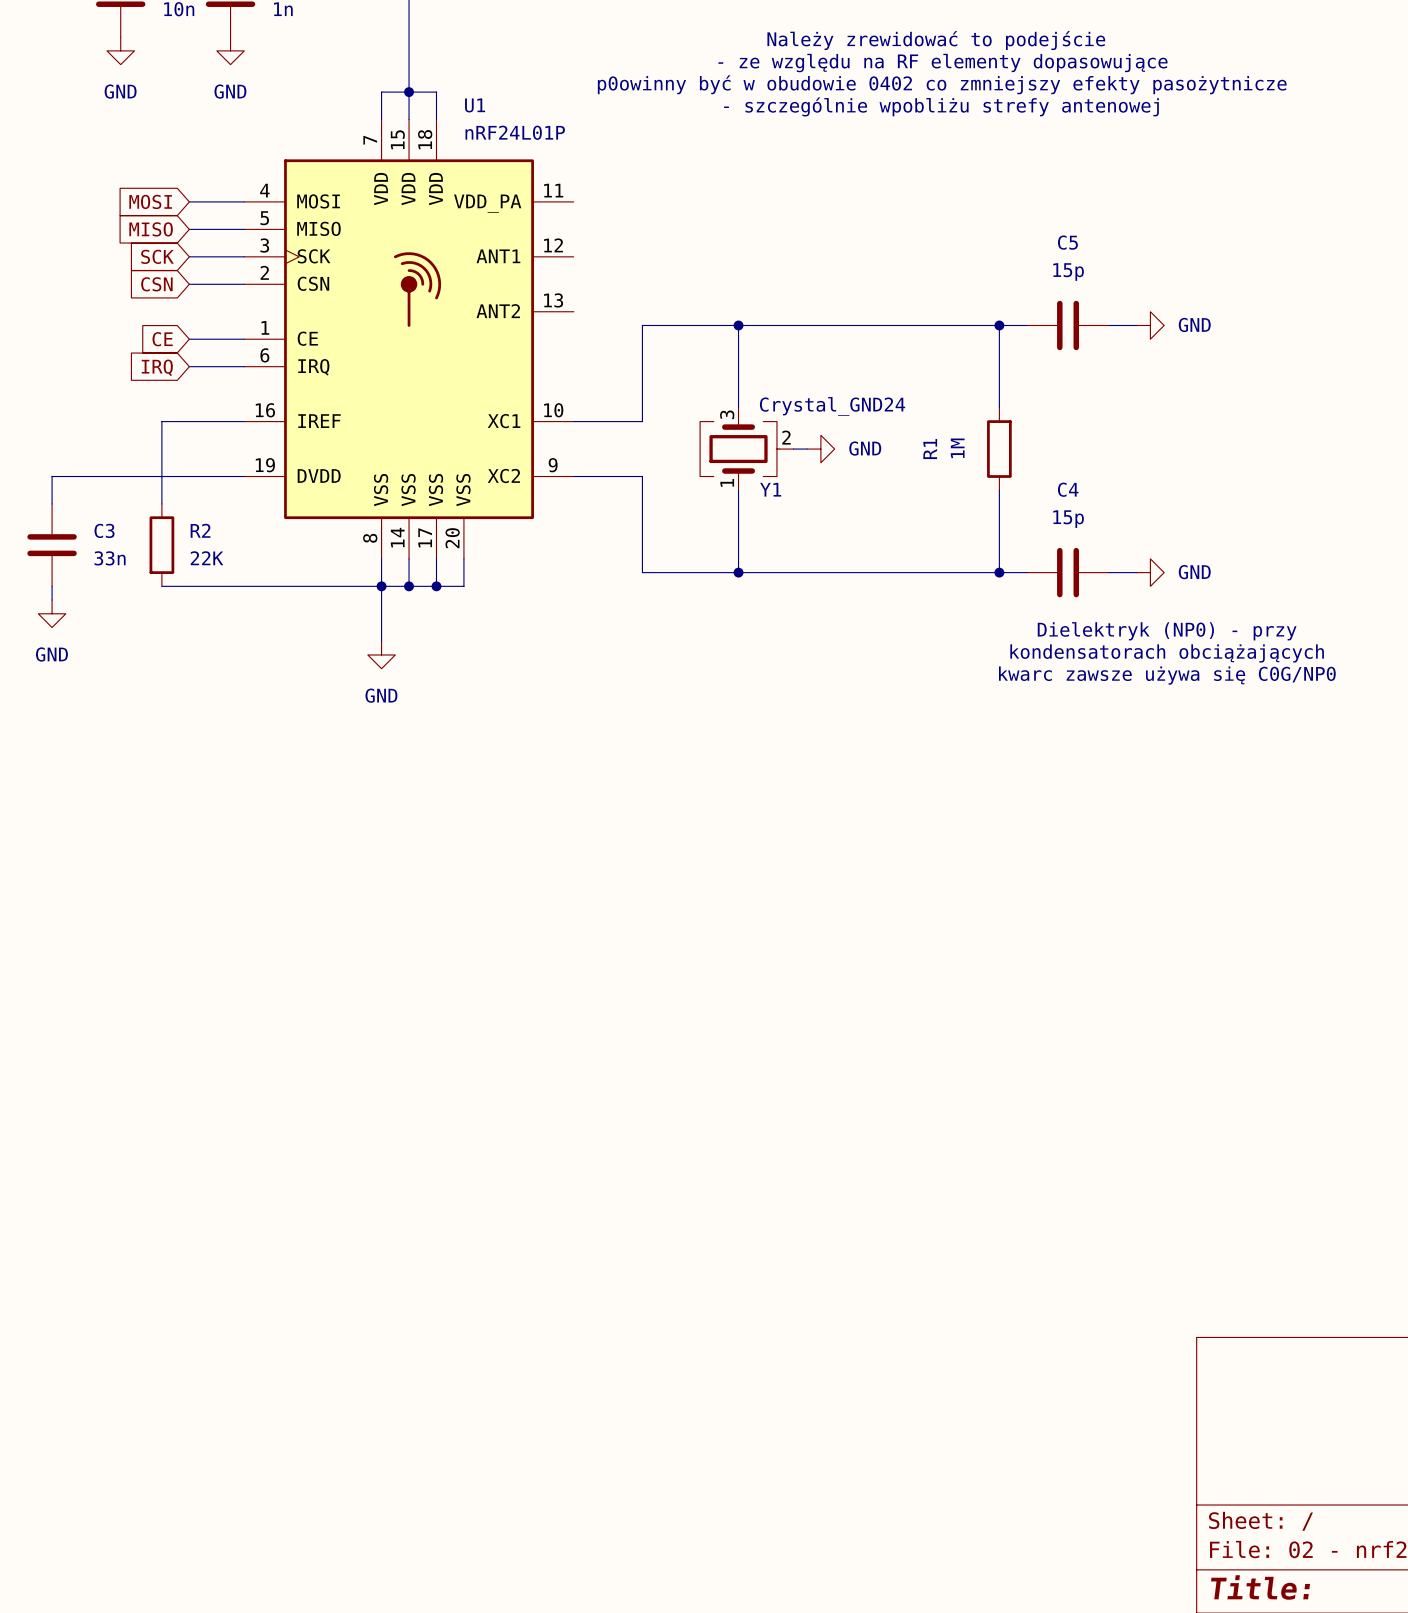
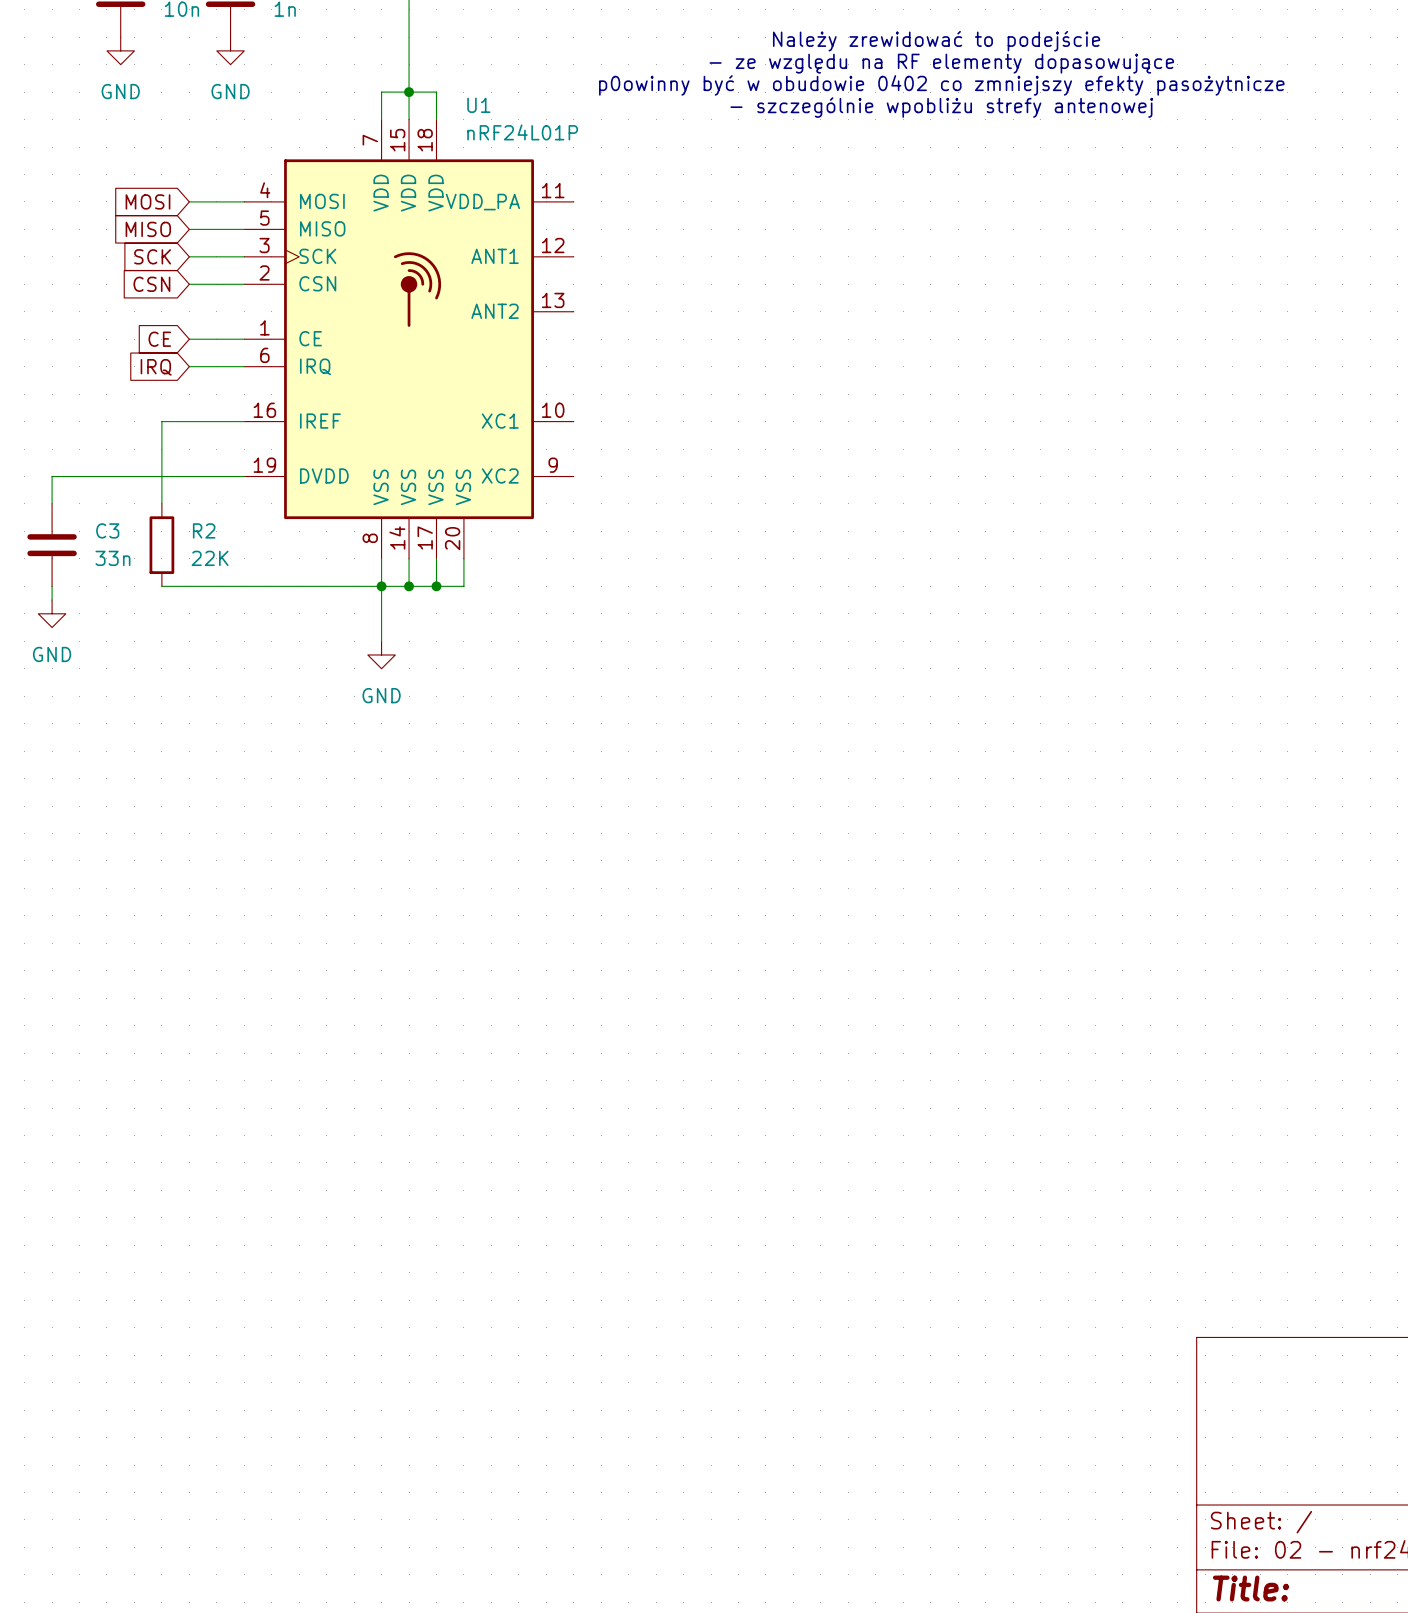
wire: (738, 325) (738, 407) -> none
junction: (738, 325) -> none
wire: (999, 325) (999, 407) -> none
junction: (999, 325) -> none
wire: (1026, 325) (642, 325) (642, 421) (573, 421) -> none
C5: 15p (1068, 325) -> none
wire: (1109, 325) (1136, 325) -> none
power symbol: GND (1150, 325) -> none
Y1: Crystal_GND24 (746, 449) -> none
wire: (793, 449) (807, 449) -> none
power symbol: GND (820, 449) -> none
R1: 1M (999, 449) -> none
wire: (573, 476) (642, 476) (642, 572) (1026, 572) -> none
wire: (738, 490) (738, 572) -> none
wire: (999, 490) (999, 572) -> none
junction: (738, 572) -> none
junction: (999, 572) -> none
C4: 15p (1068, 572) -> none
wire: (1109, 572) (1136, 572) -> none
power symbol: GND (1150, 572) -> none
text: Dielektryk (NP0) - przy (1167, 631) -> none
text: kondensatorach obciążających (1167, 653) -> none
text: kwarc zawsze używa się C0G/NP0 (1167, 675) -> none

